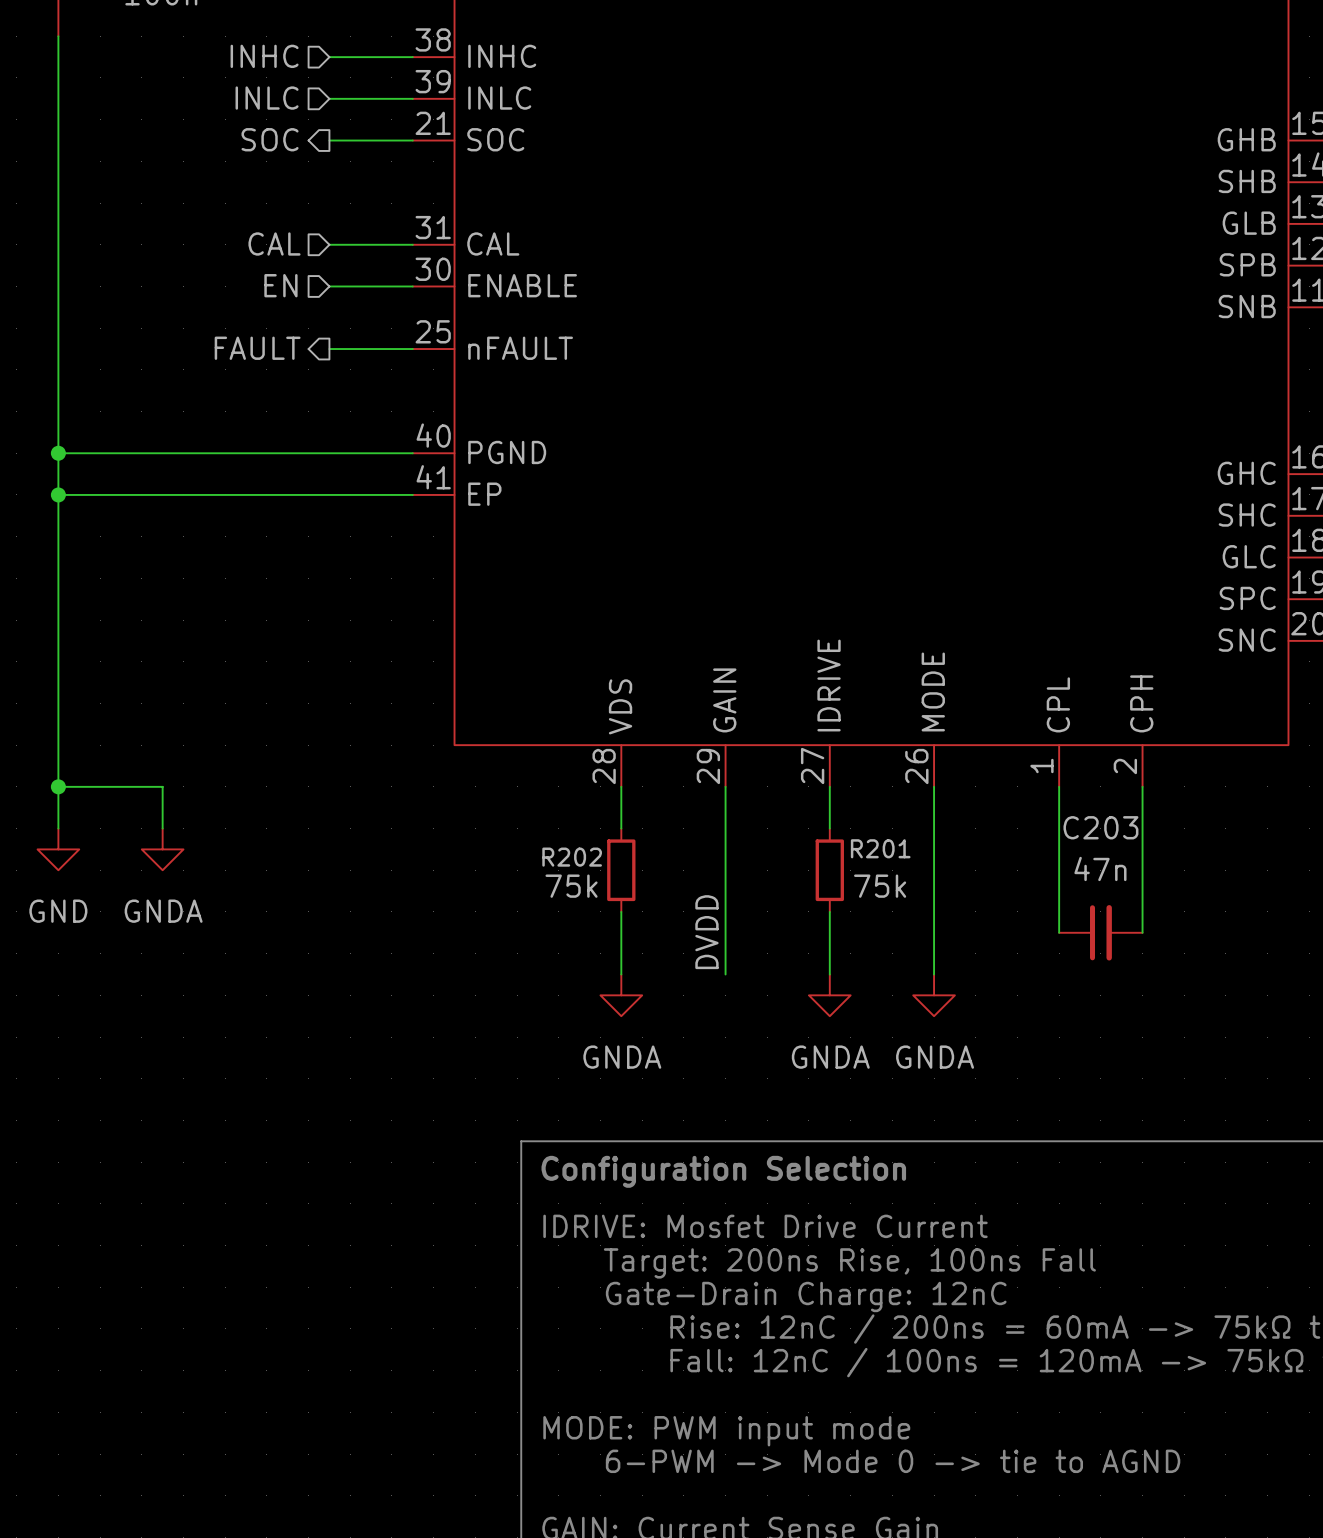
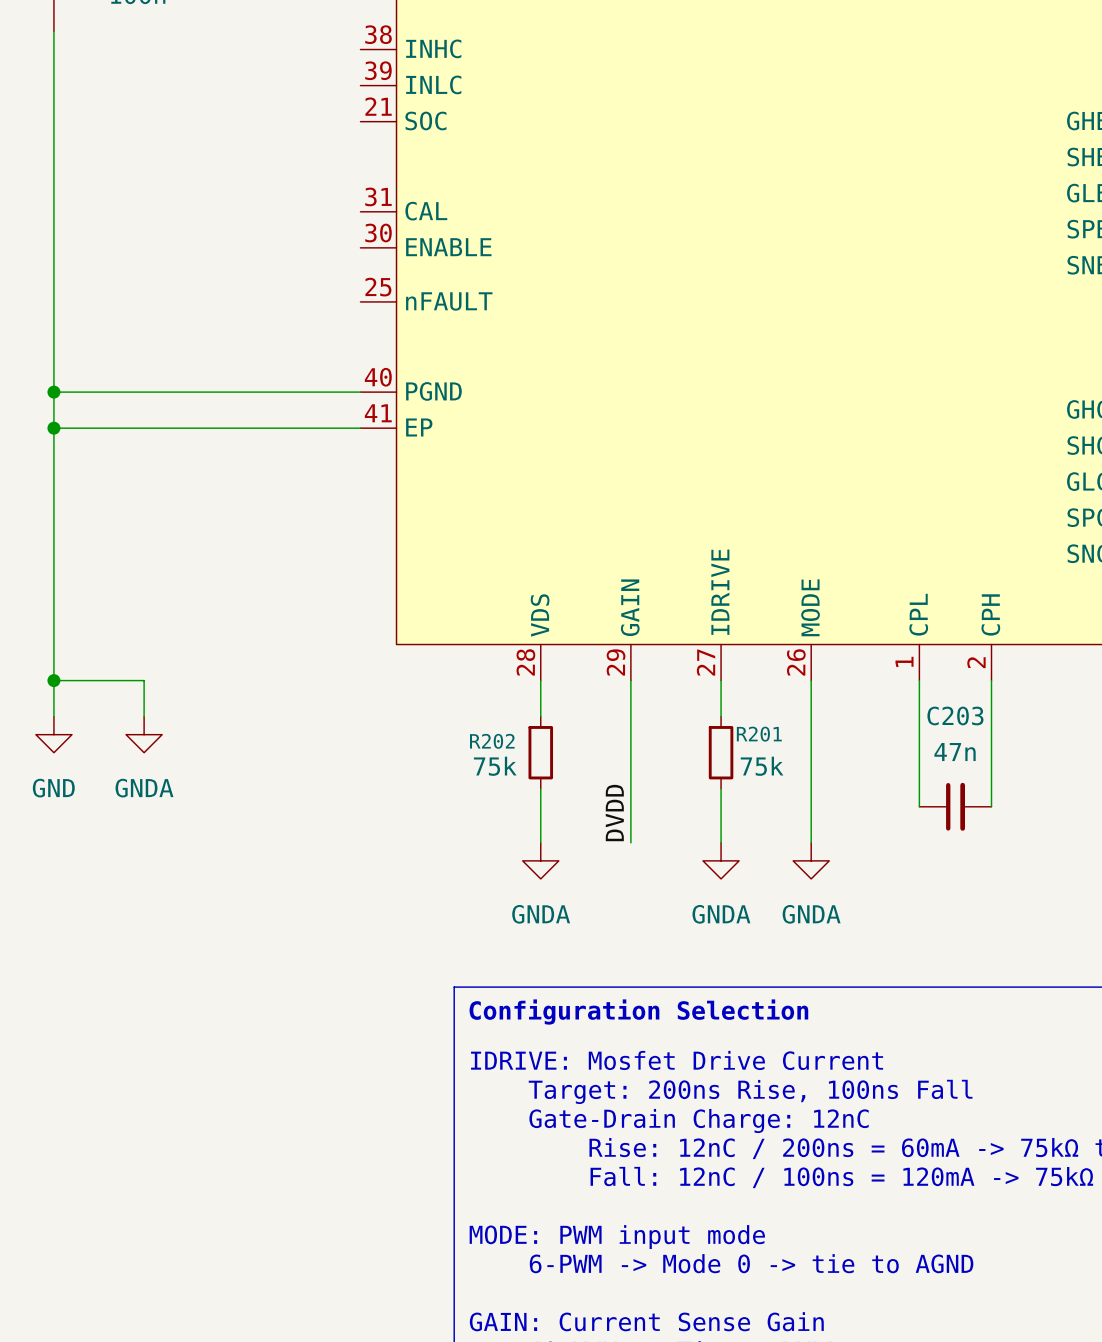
hierarchical label: INHC (264, 56) -> none
wire: (329, 57) (412, 57) -> none
hierarchical label: INLC (267, 98) -> none
wire: (329, 98) (412, 98) -> none
hierarchical label: SOC (270, 139) -> none
wire: (329, 140) (412, 140) -> none
hierarchical label: CAL (274, 243) -> none
wire: (329, 244) (412, 244) -> none
hierarchical label: EN (280, 285) -> none
wire: (329, 286) (412, 286) -> none
hierarchical label: FAULT (257, 348) -> none
wire: (329, 349) (412, 349) -> none

